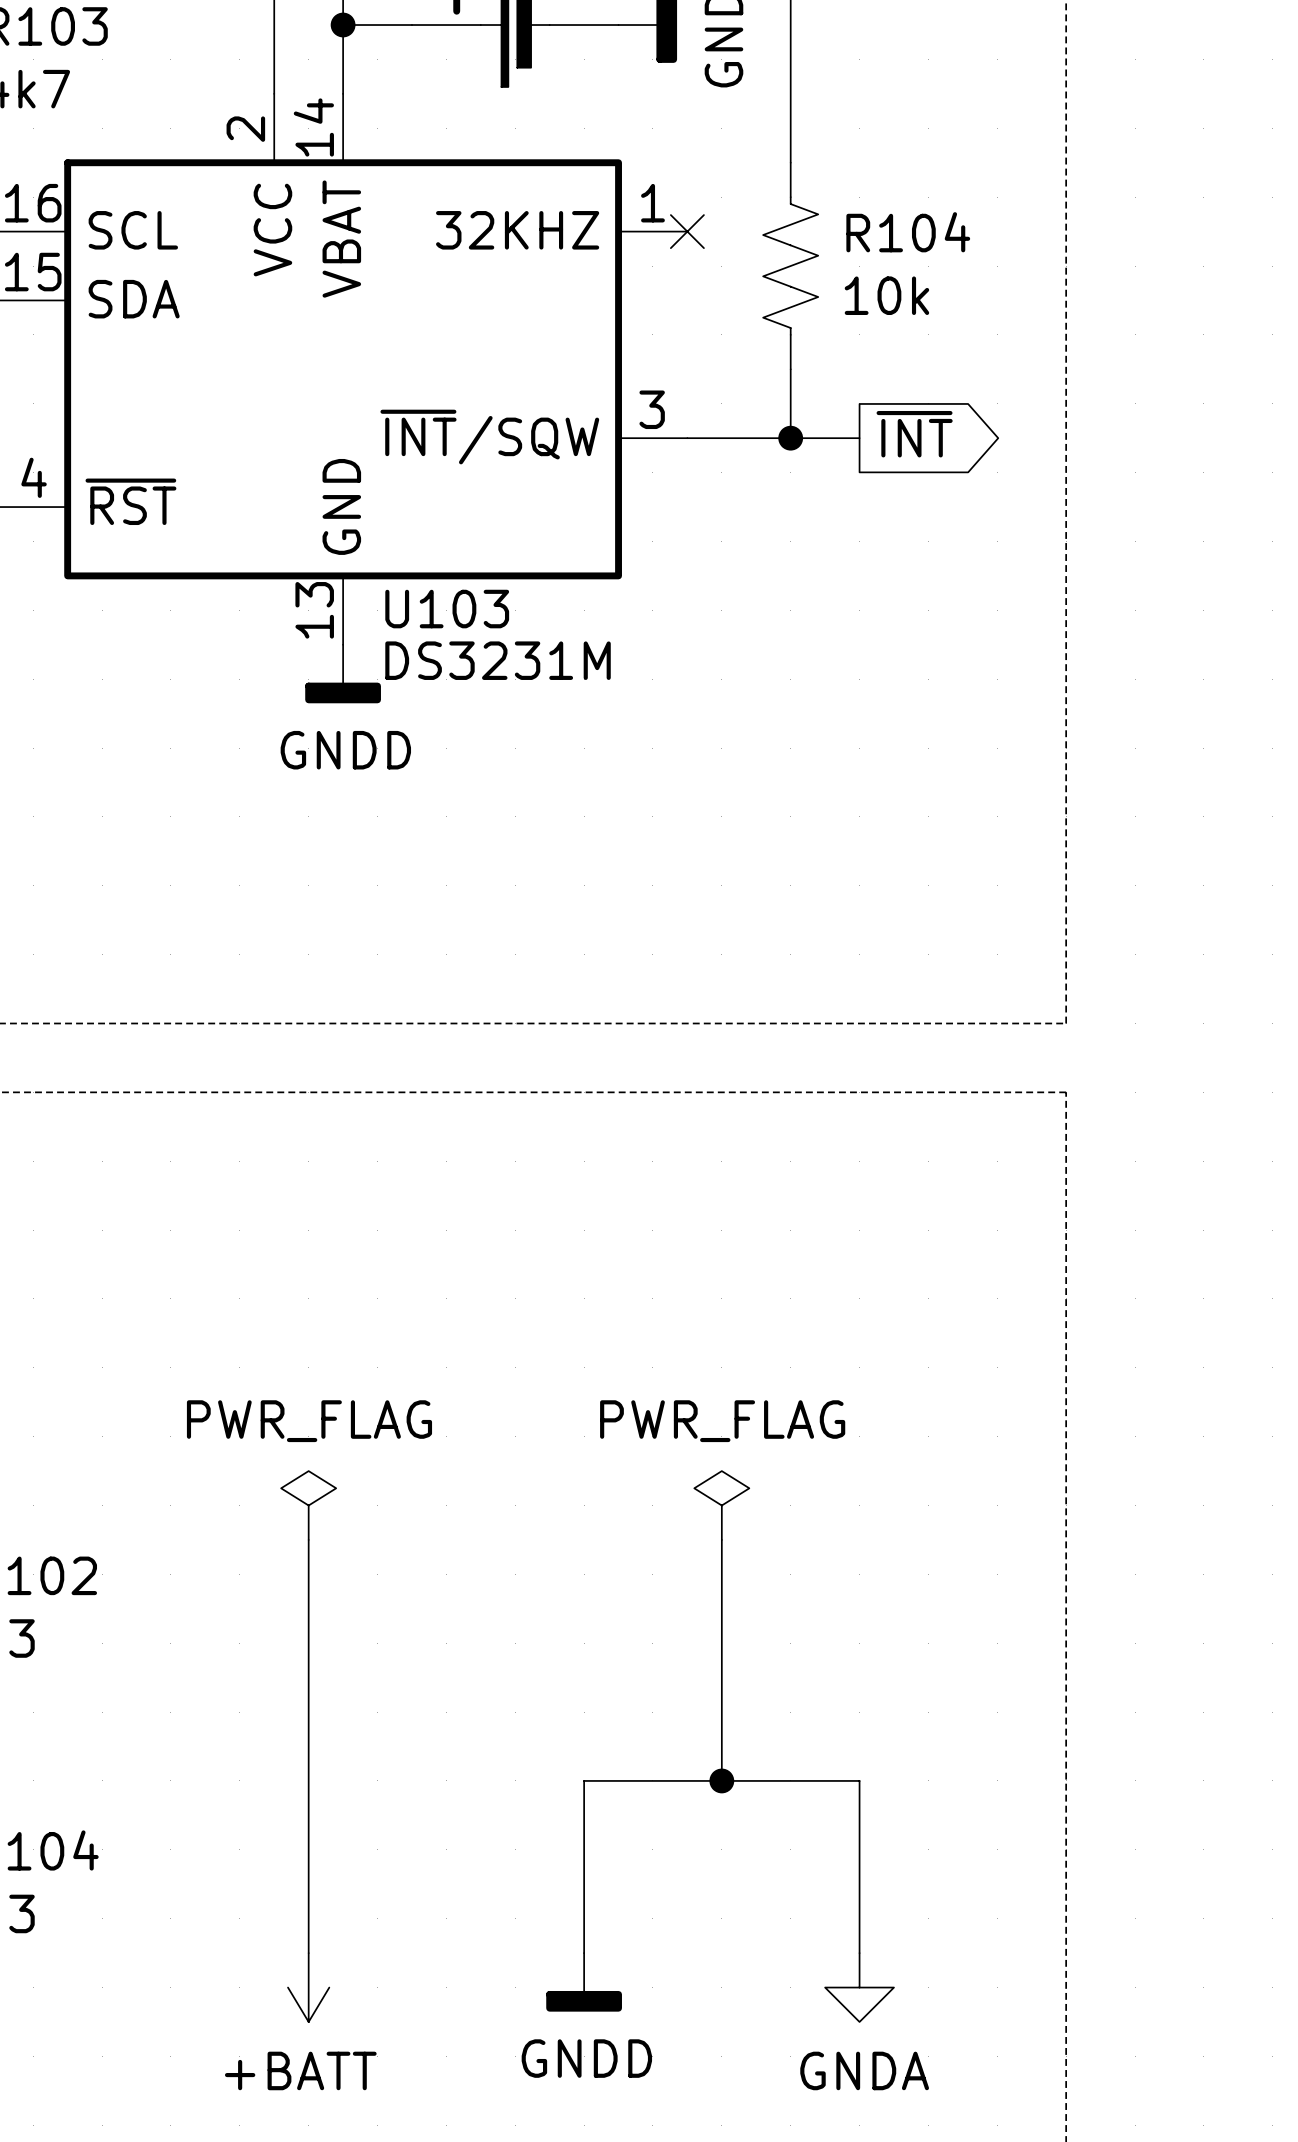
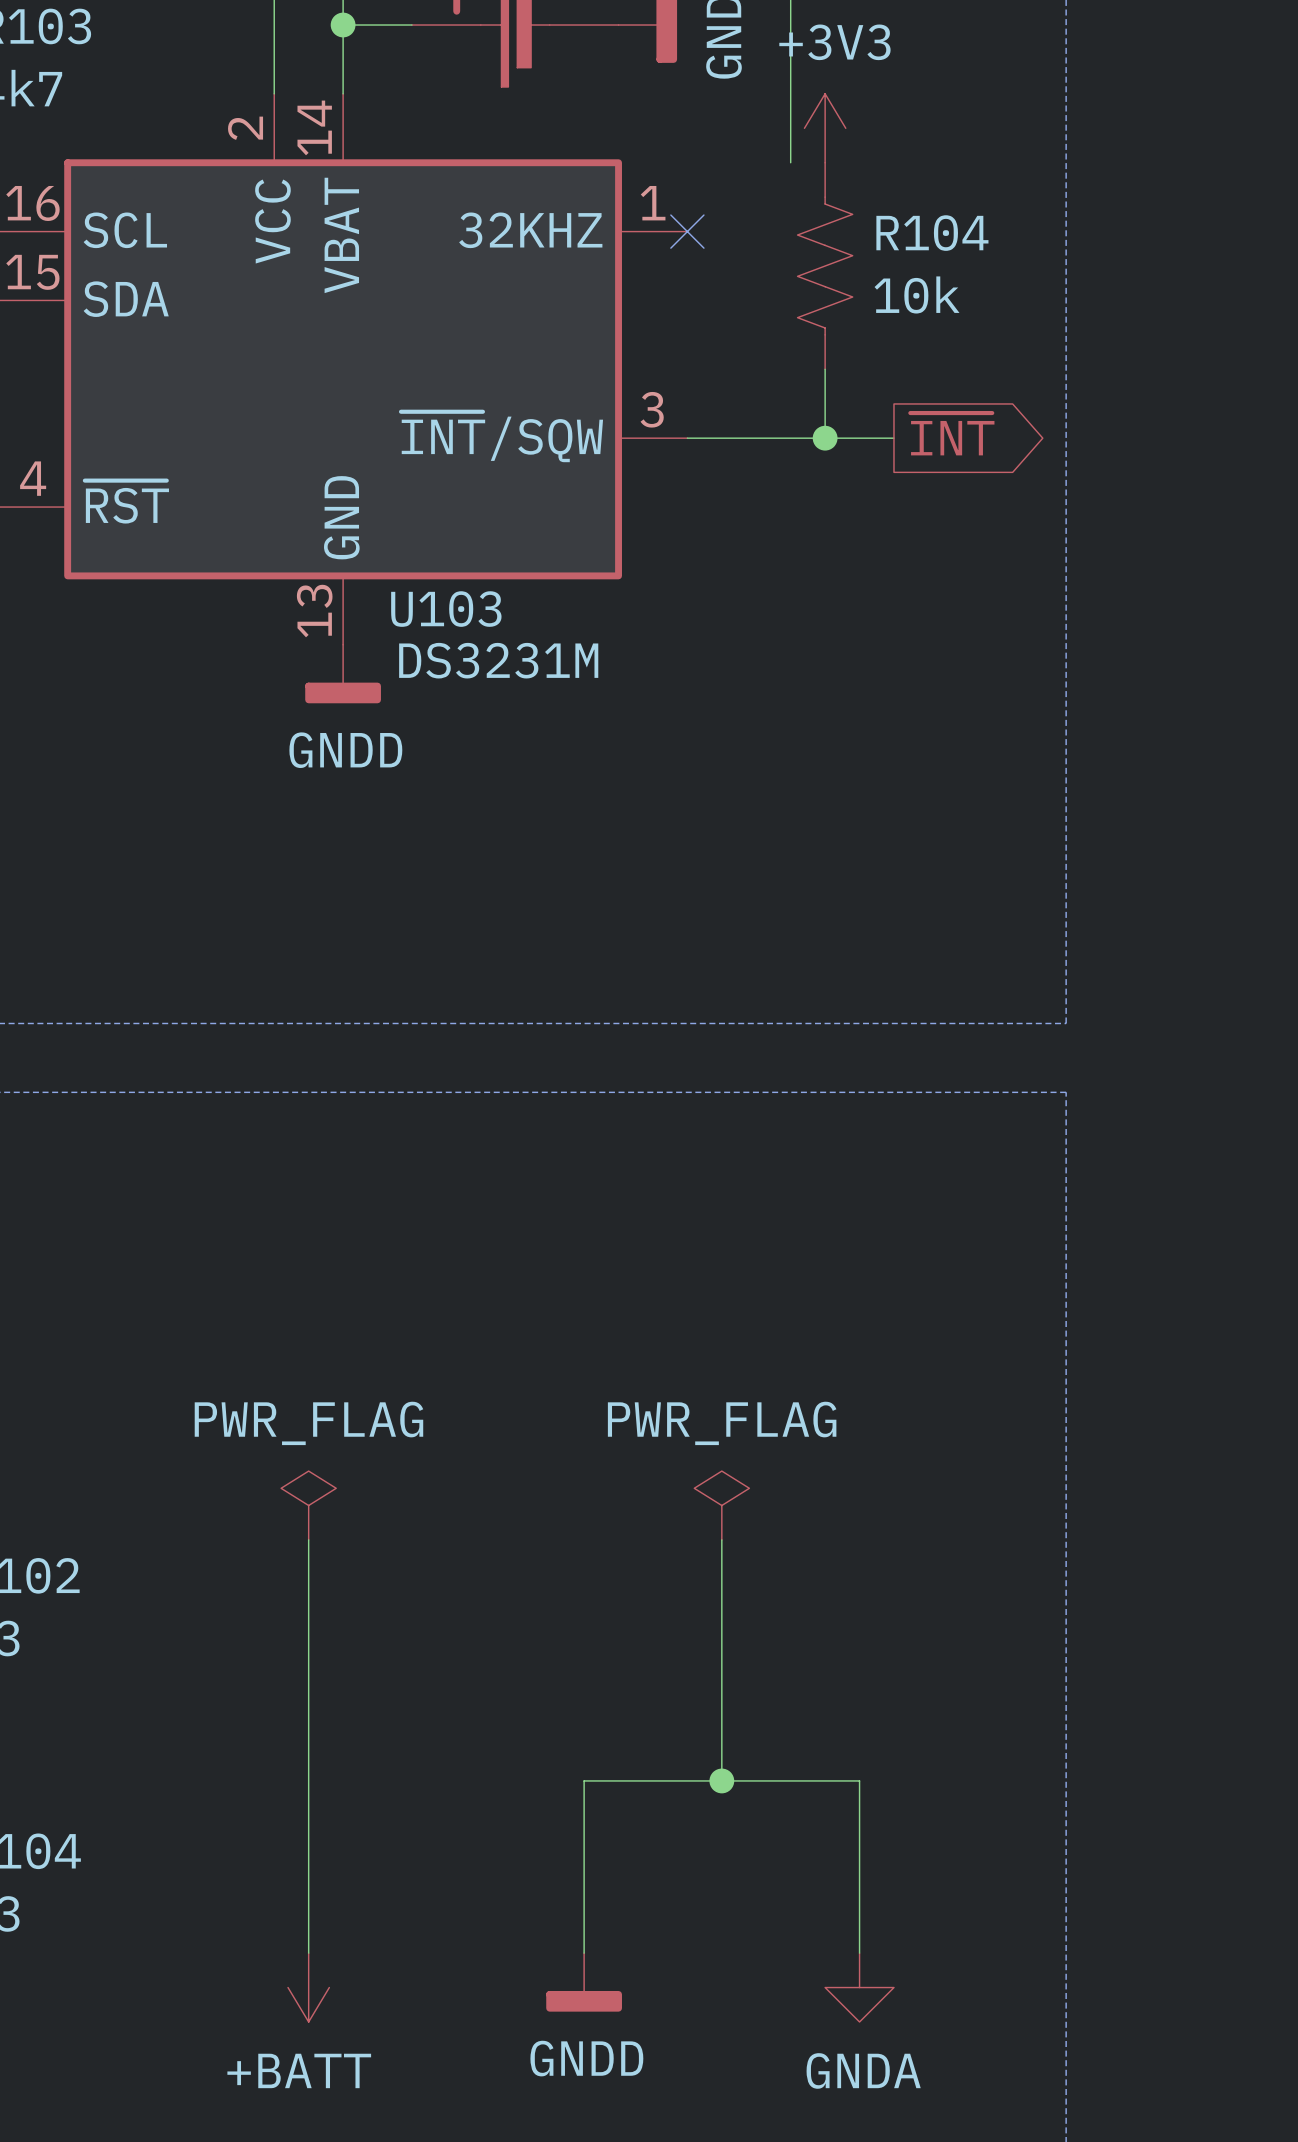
power symbol: none -> +3V3 (825, 128)
R104 position: (790, 266) -> (825, 266)
wire: (790, 369) (790, 438) -> (825, 369) (825, 438)
global label position: ~{INT} (914, 434) -> ~{INT} (952, 434)
junction position: (790, 438) -> (825, 438)
wire: none -> (859, 438) (893, 438)

